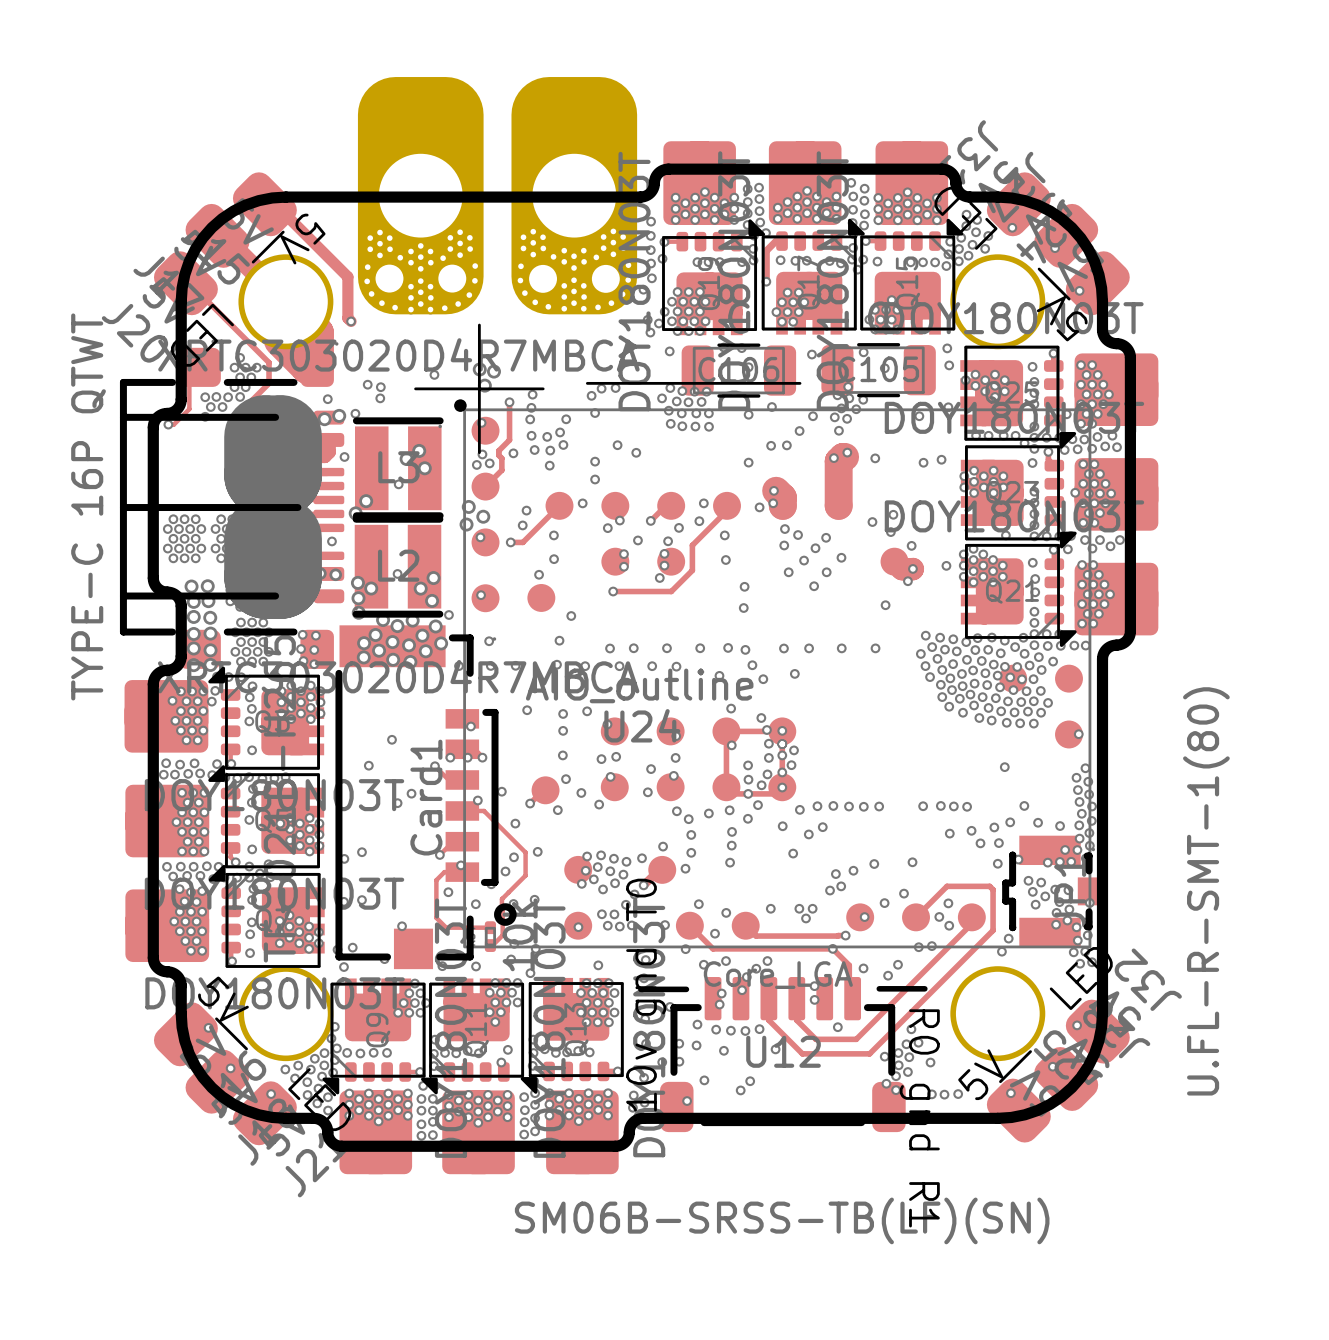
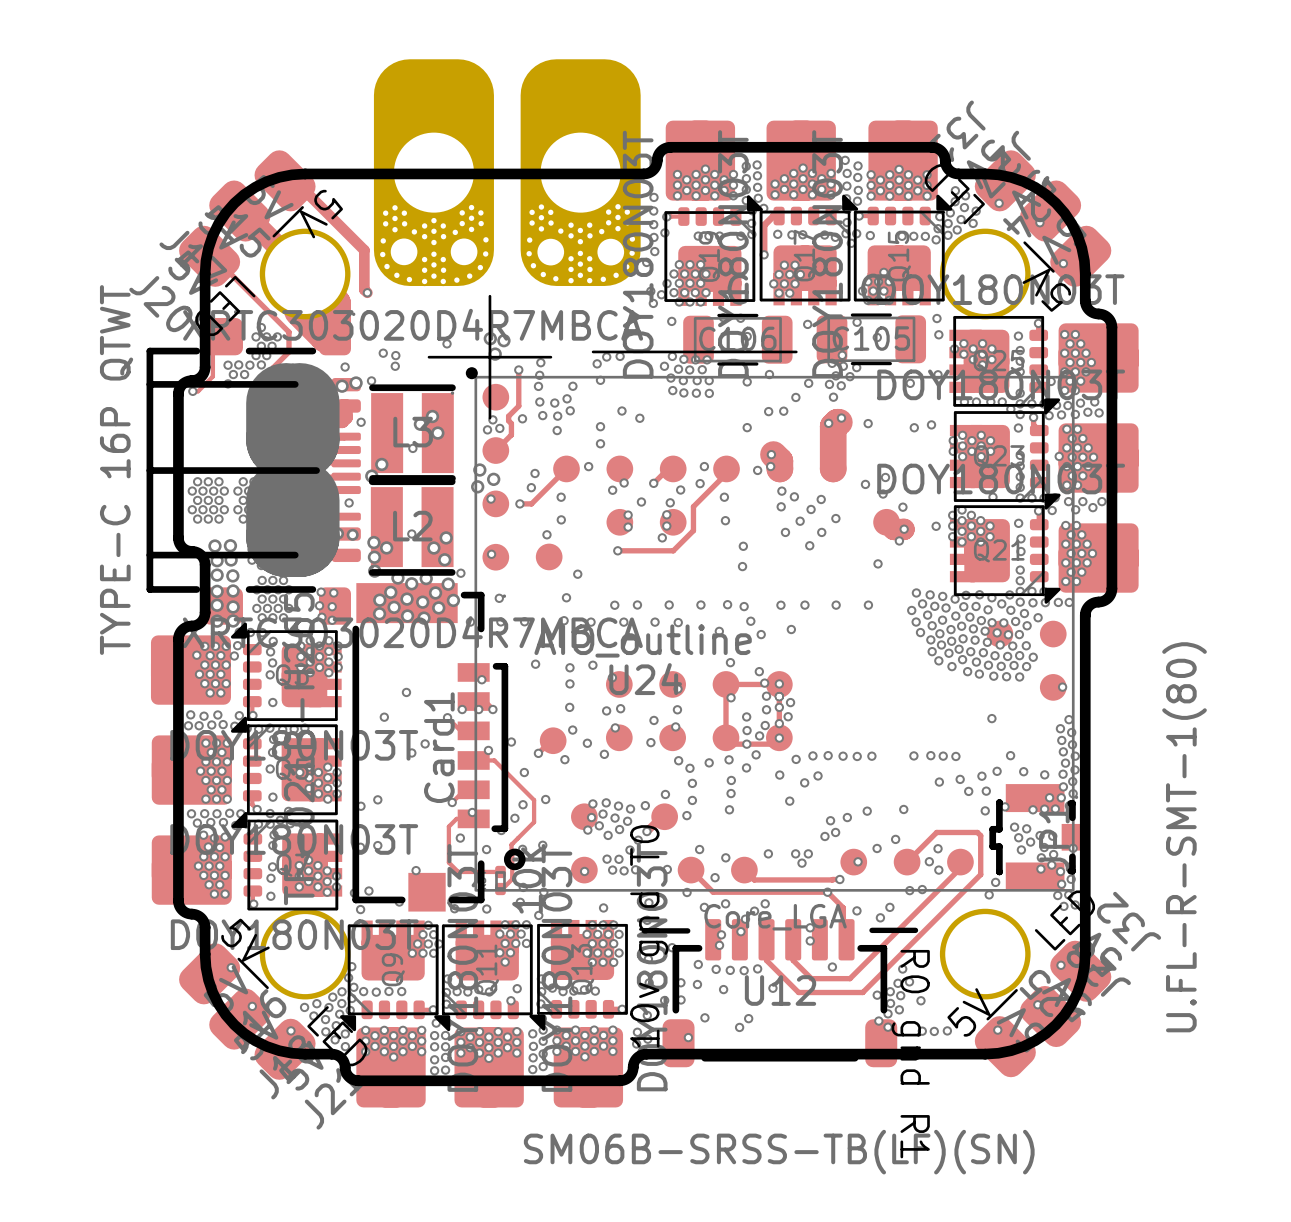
via: (481, 422) -> none

